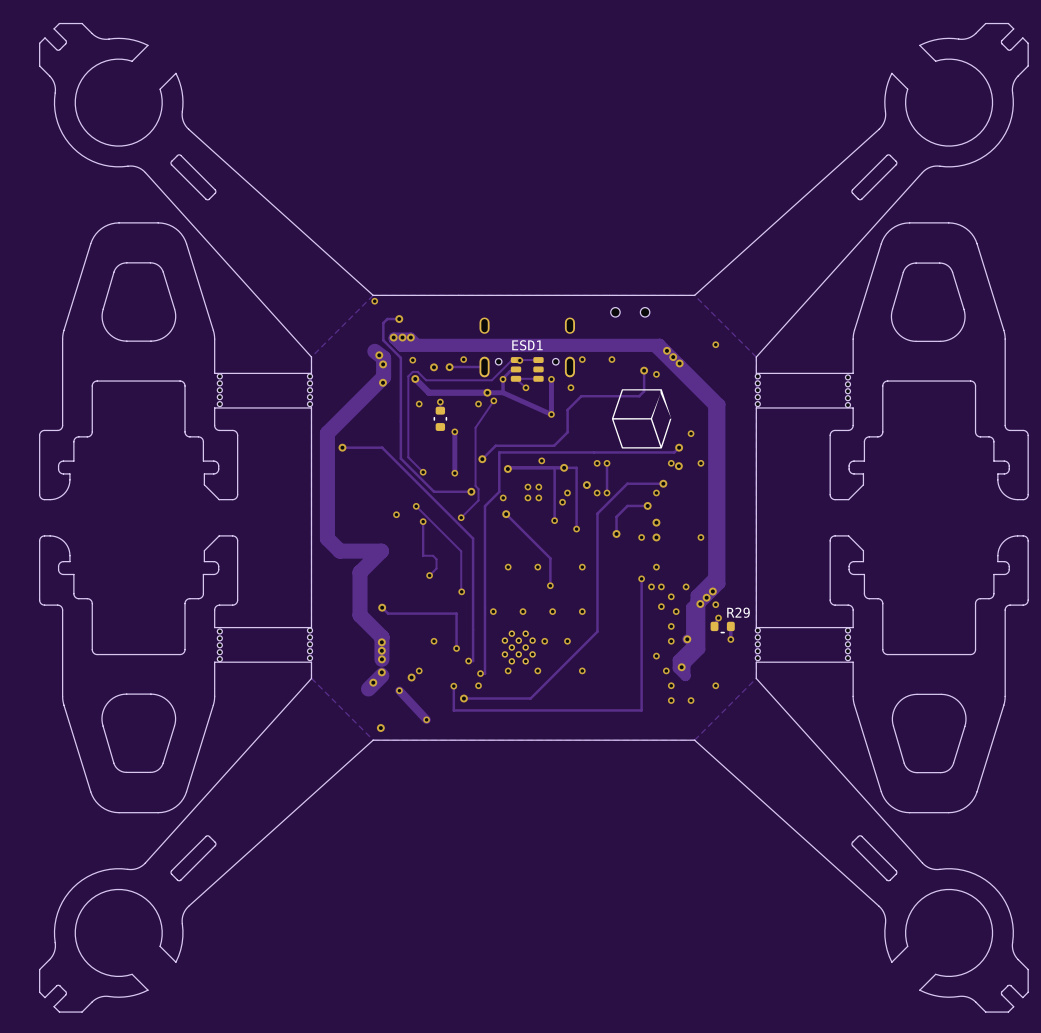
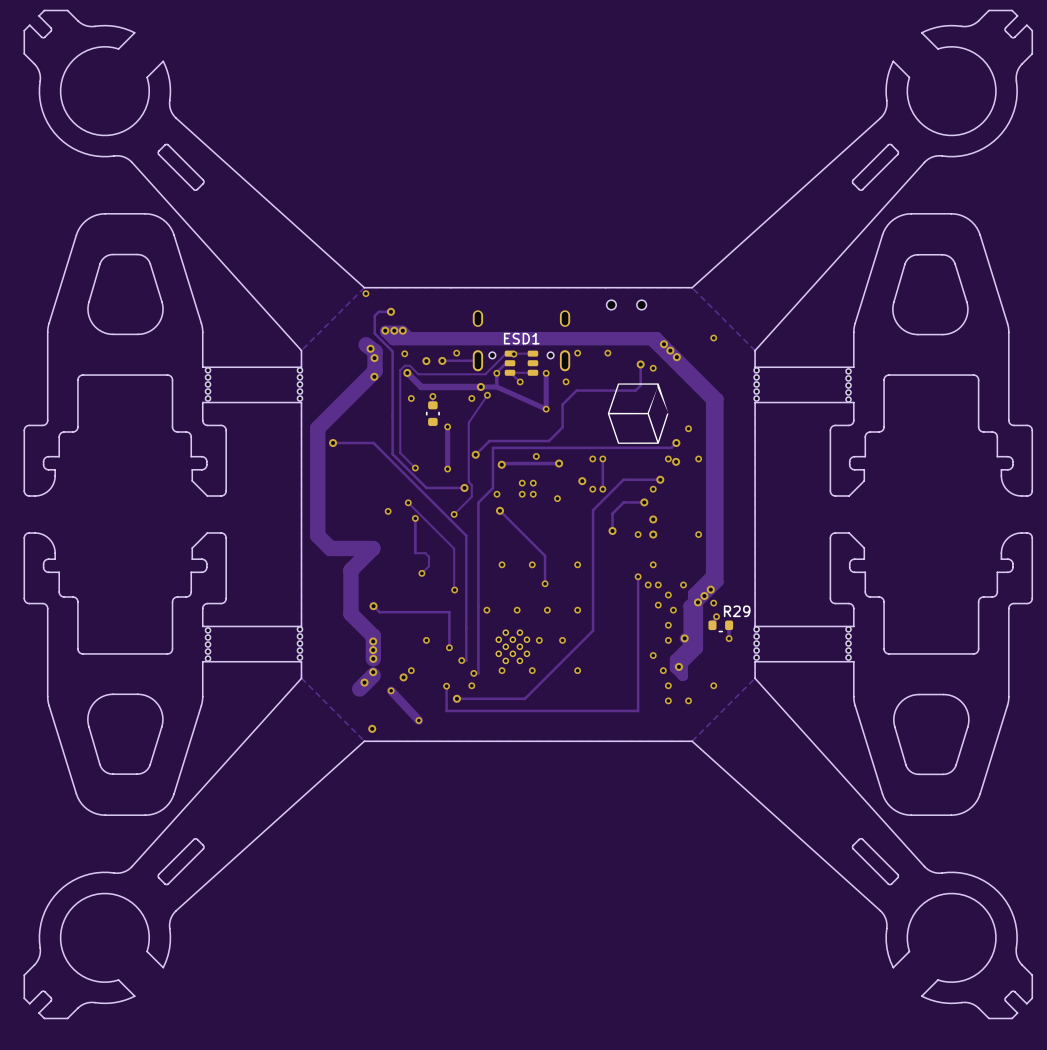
track: (507, 467) (554, 467) (554, 520) -> none
track: (564, 467) (576, 467) (576, 529) -> none
via: (567, 492) -> none
via: (554, 520) -> none
via: (576, 529) -> none

